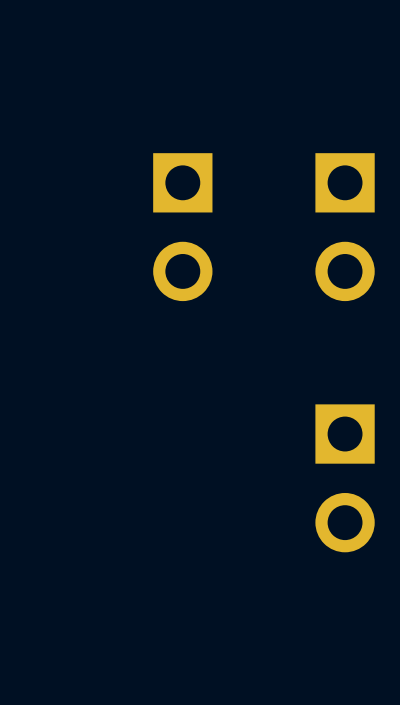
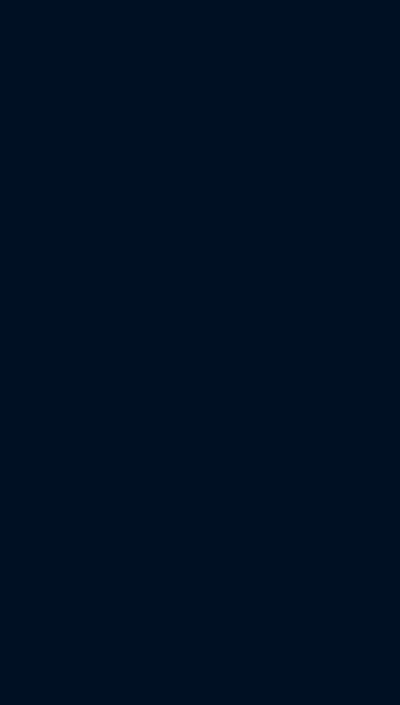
part: (182, 227) -> none
part: (345, 227) -> none
part: (345, 478) -> none

